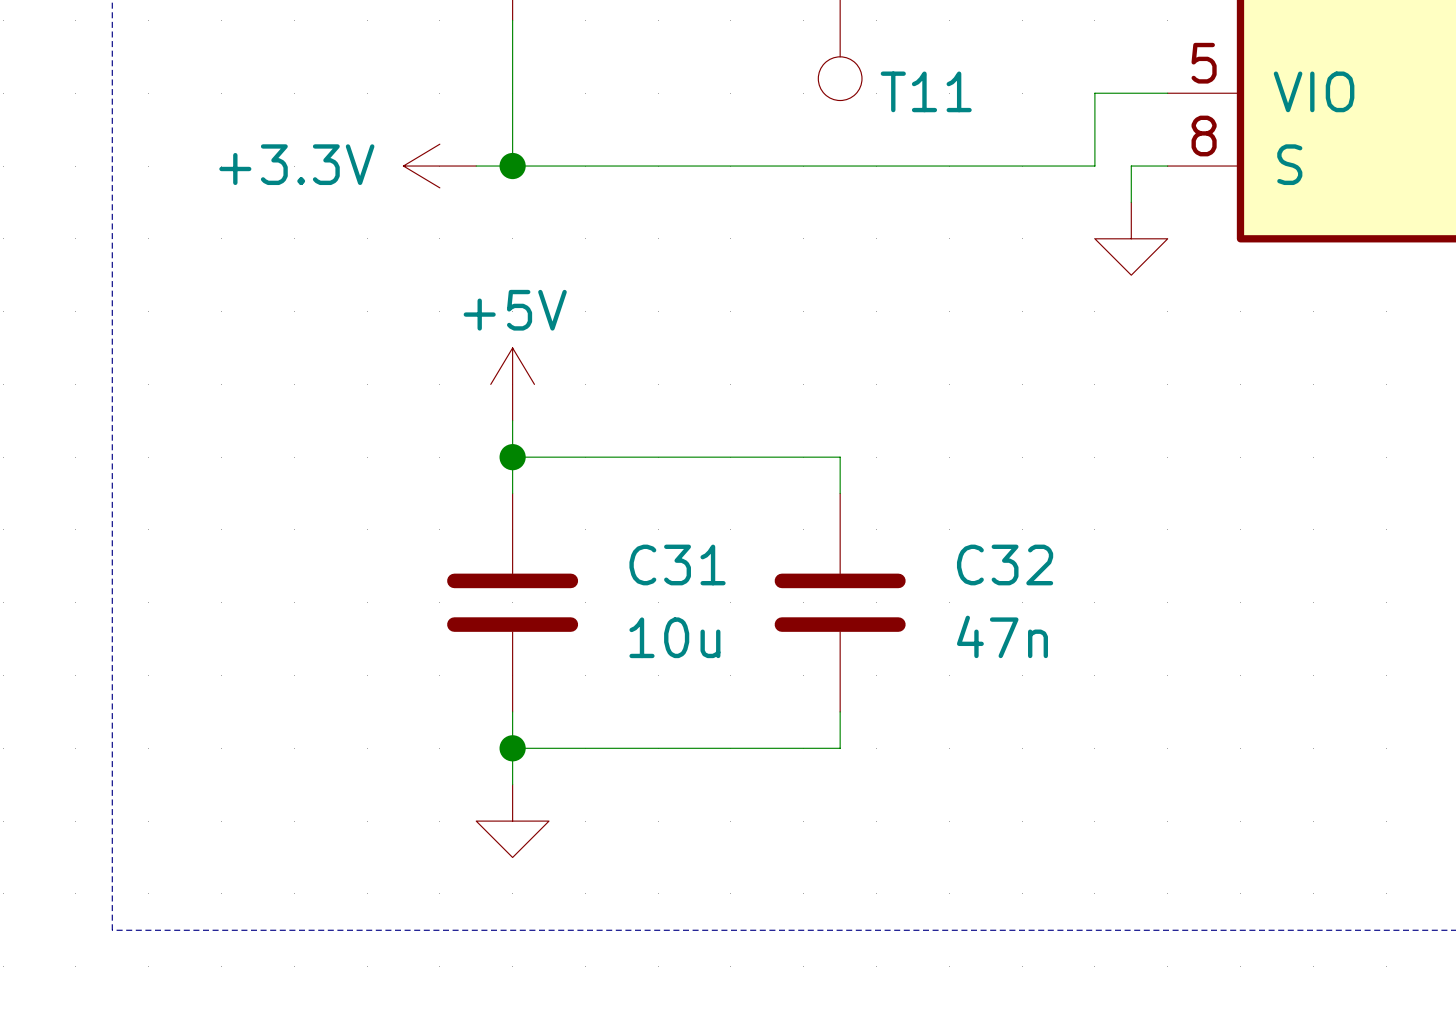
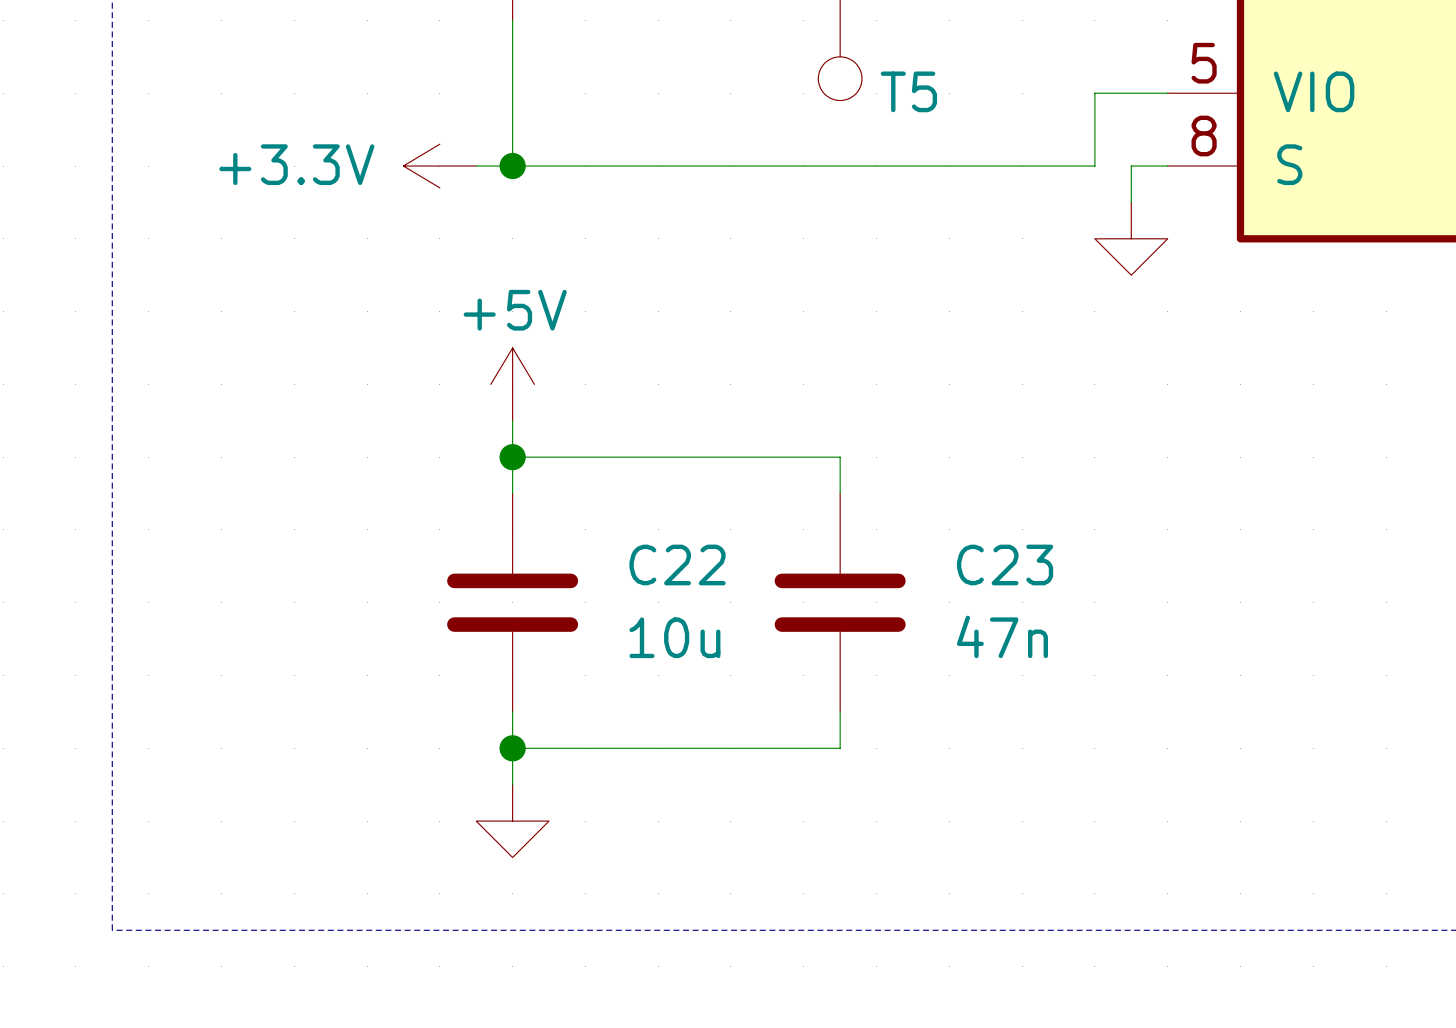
T11 name: T11 (926, 91) -> T5 (908, 91)
C31 name: C31 (677, 564) -> C22 (677, 564)
C32 name: C32 (1005, 564) -> C23 (1005, 564)

